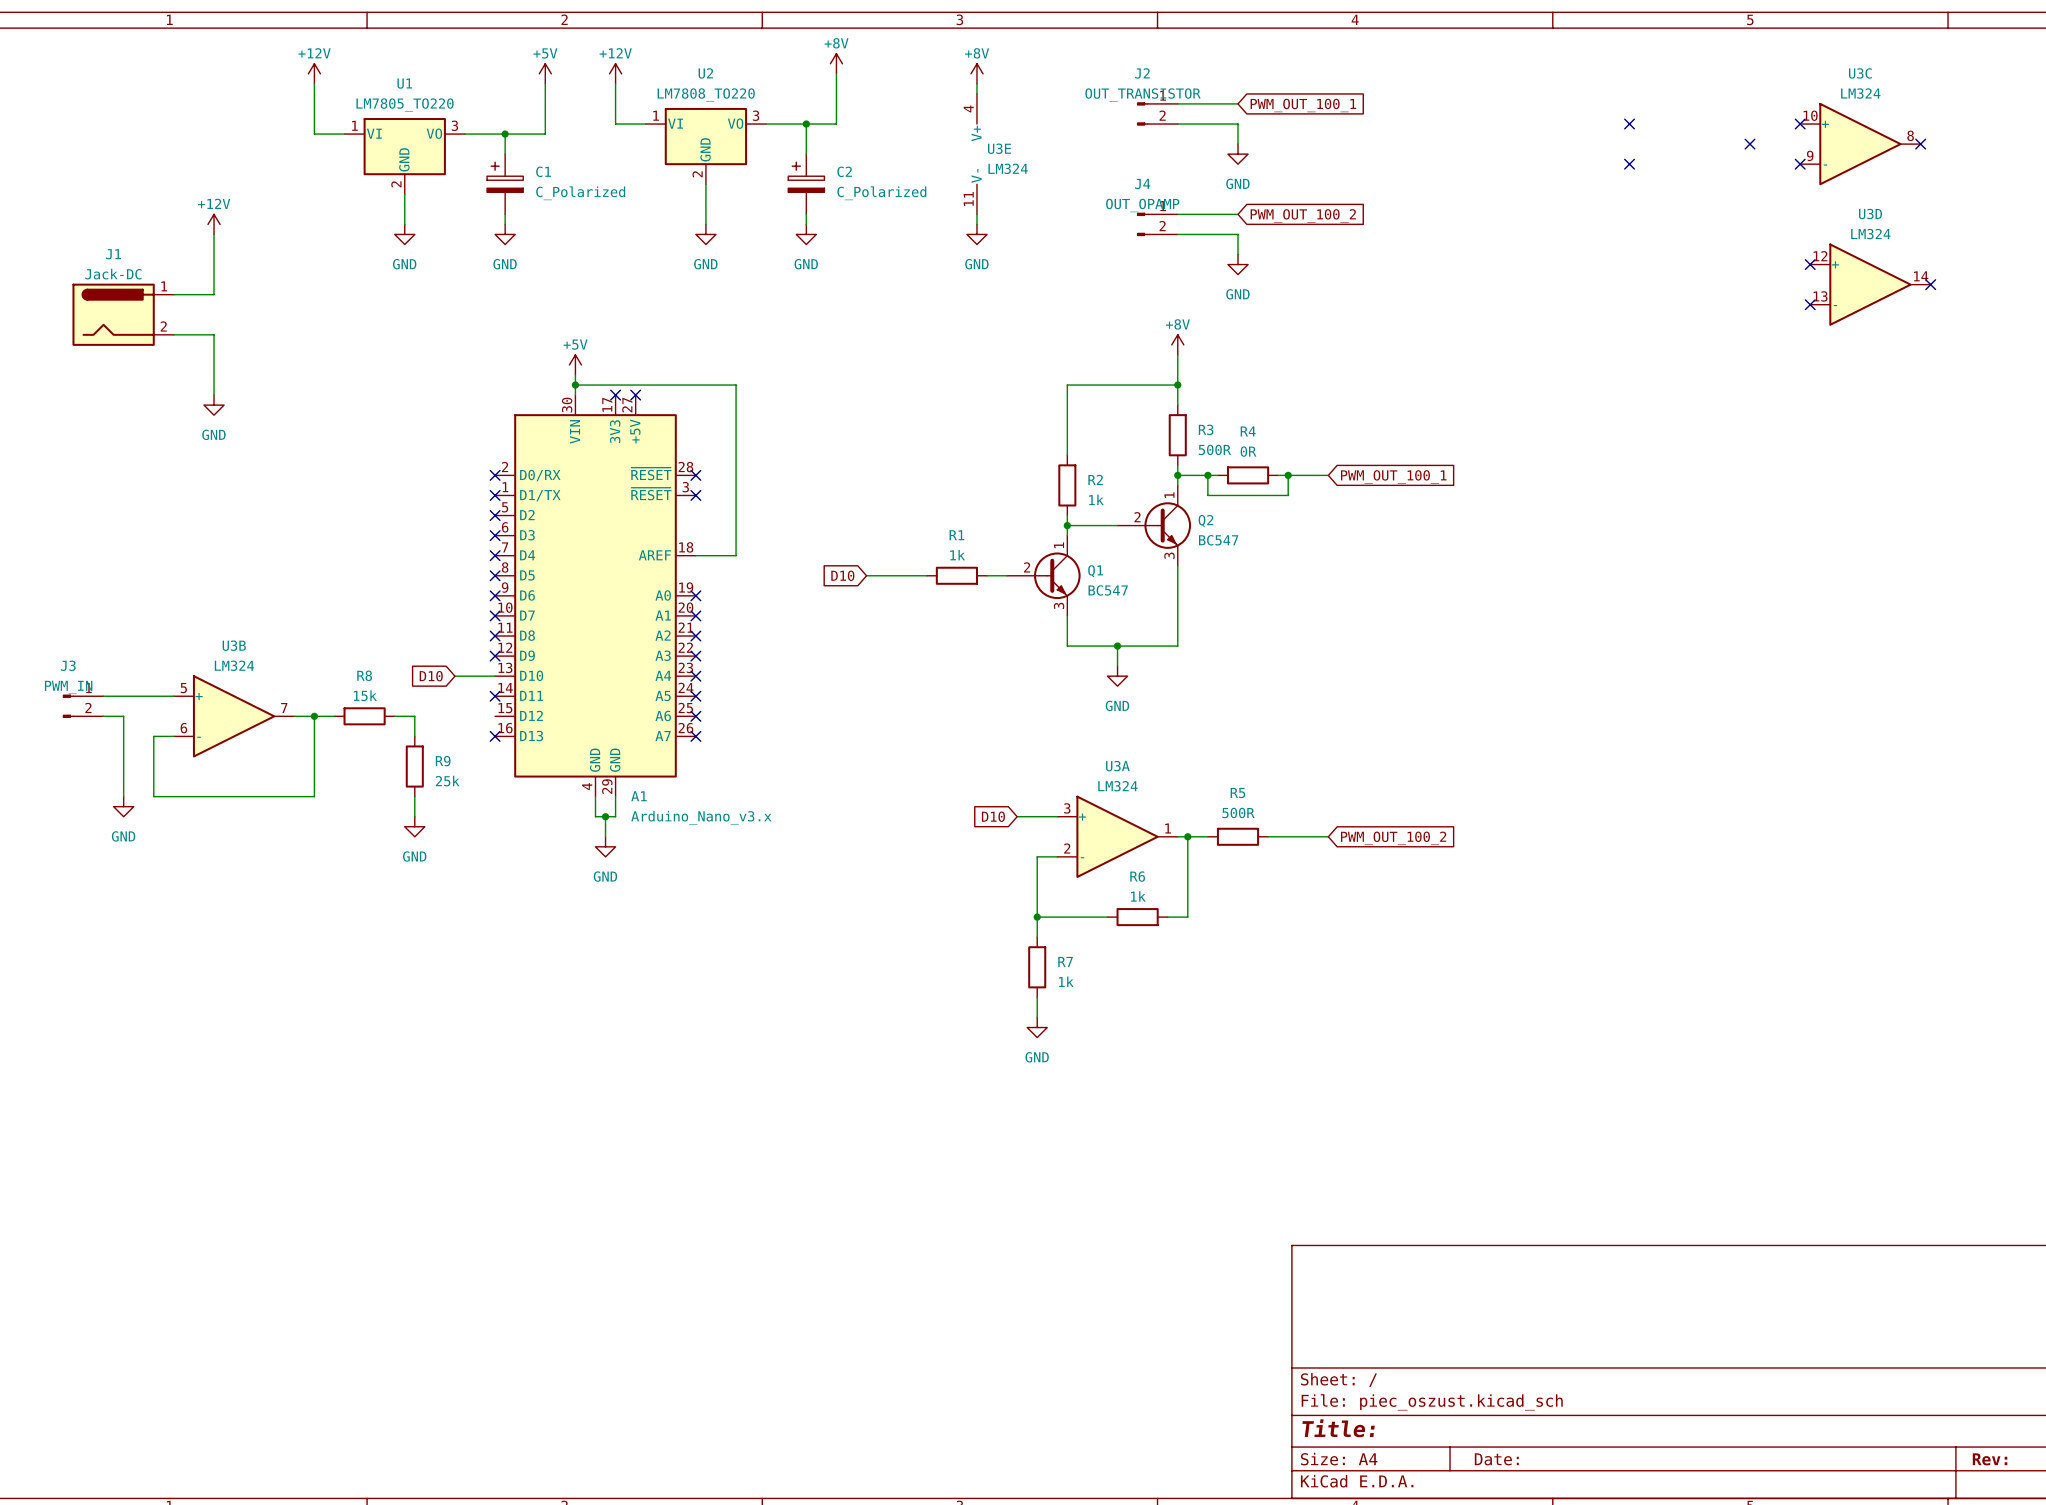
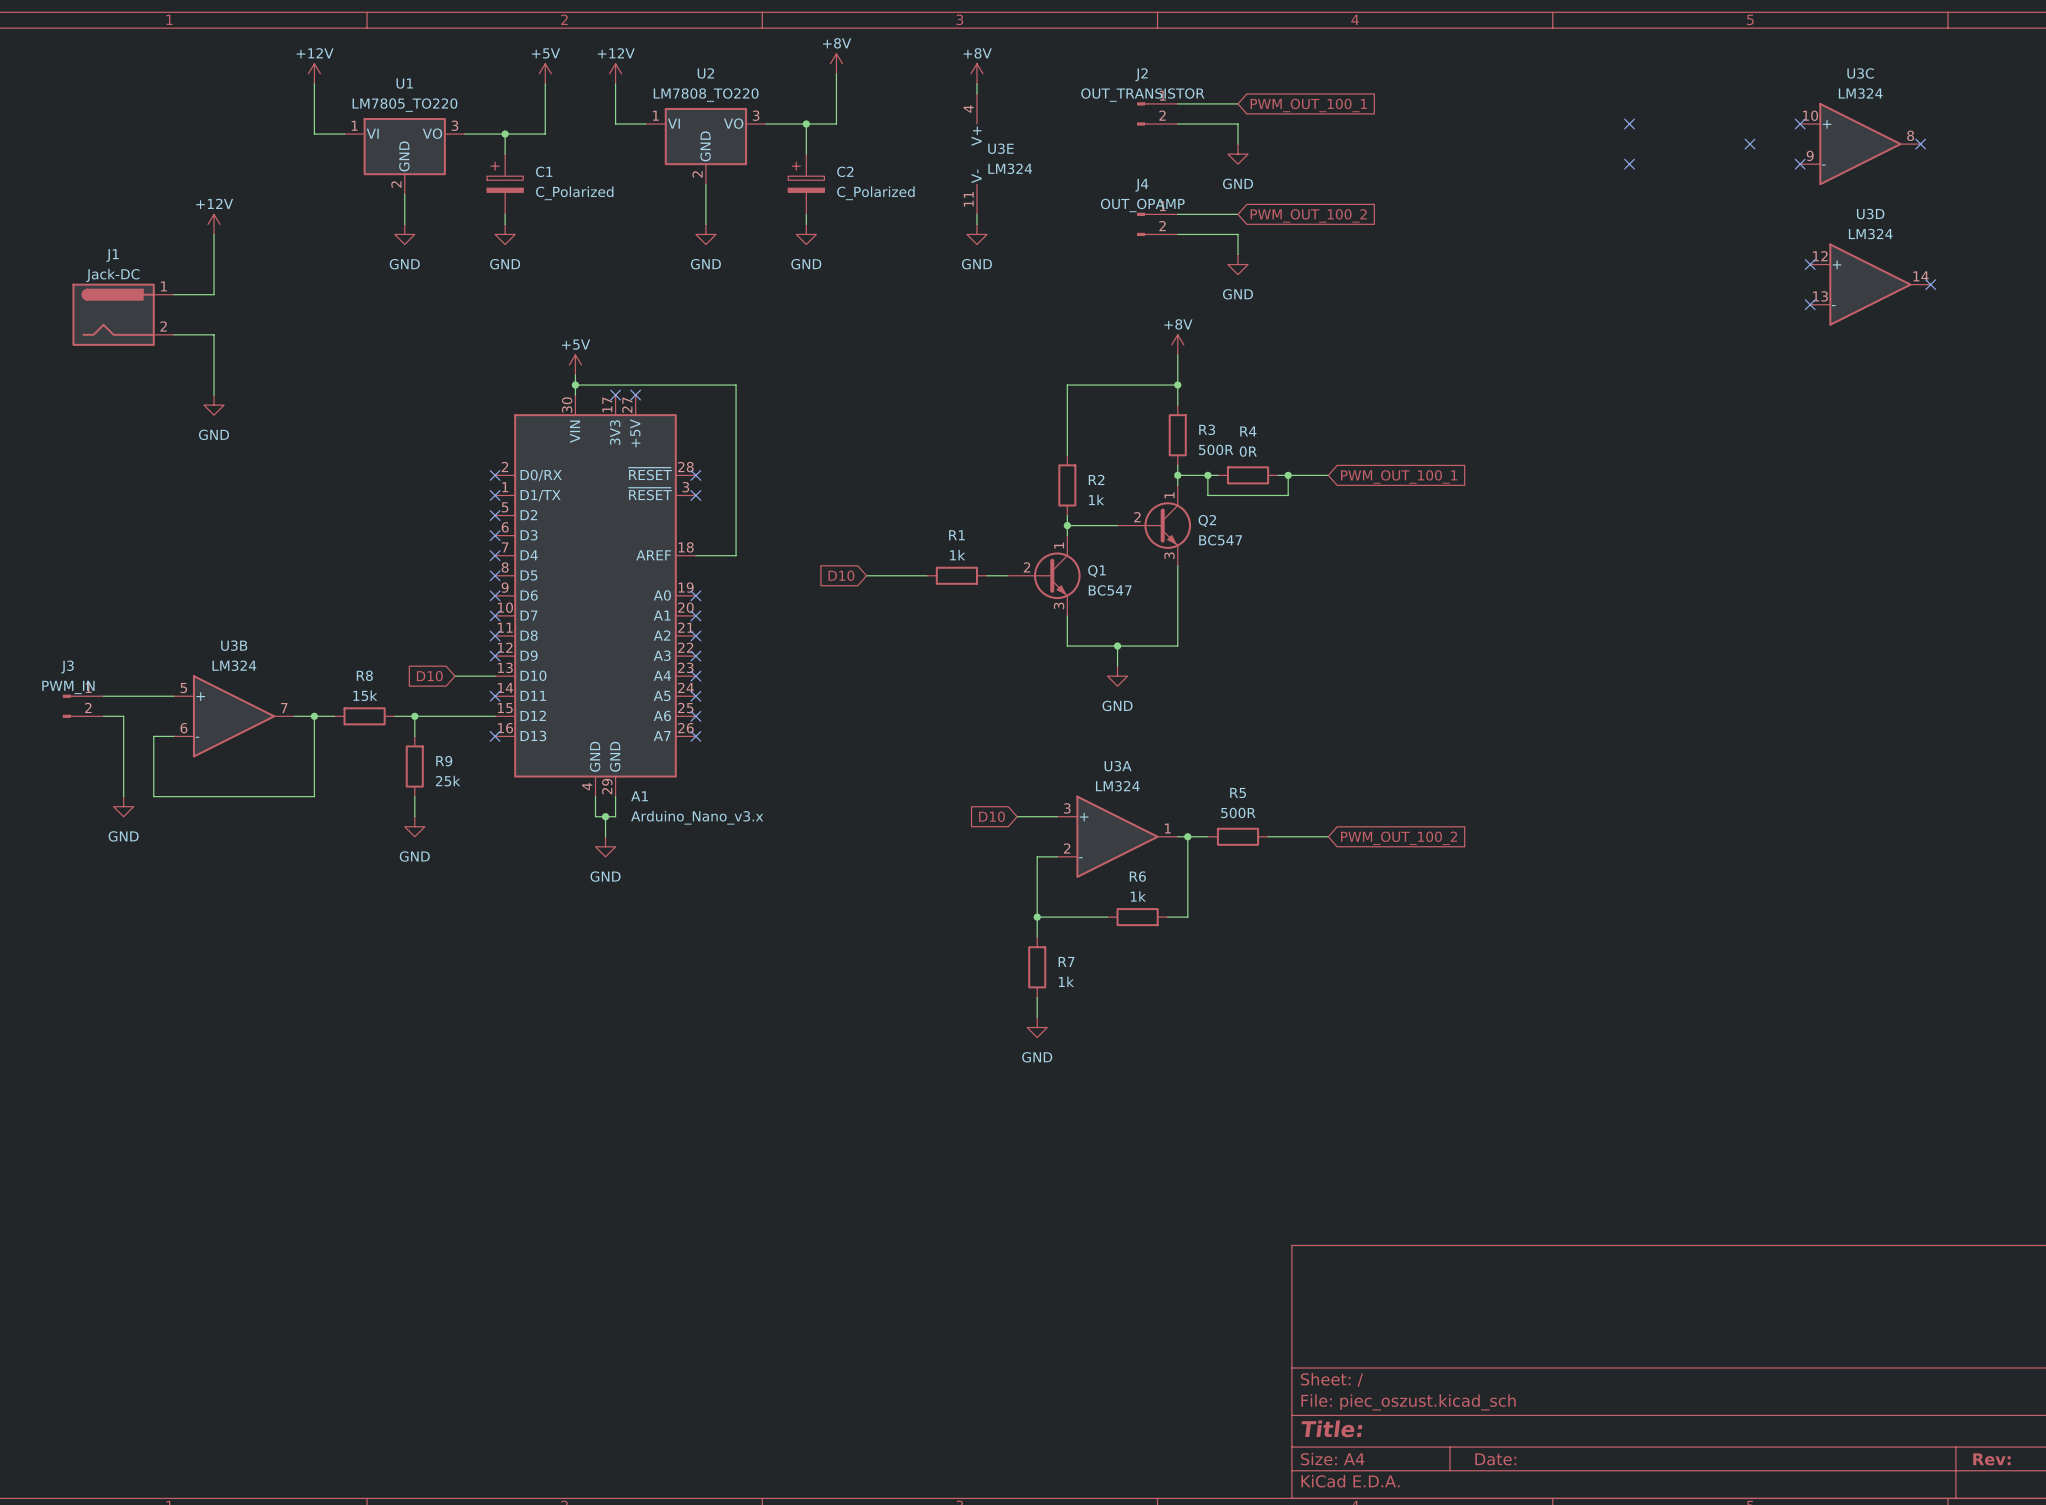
wire: none -> (414, 716) (495, 716)
junction: none -> (414, 716)

